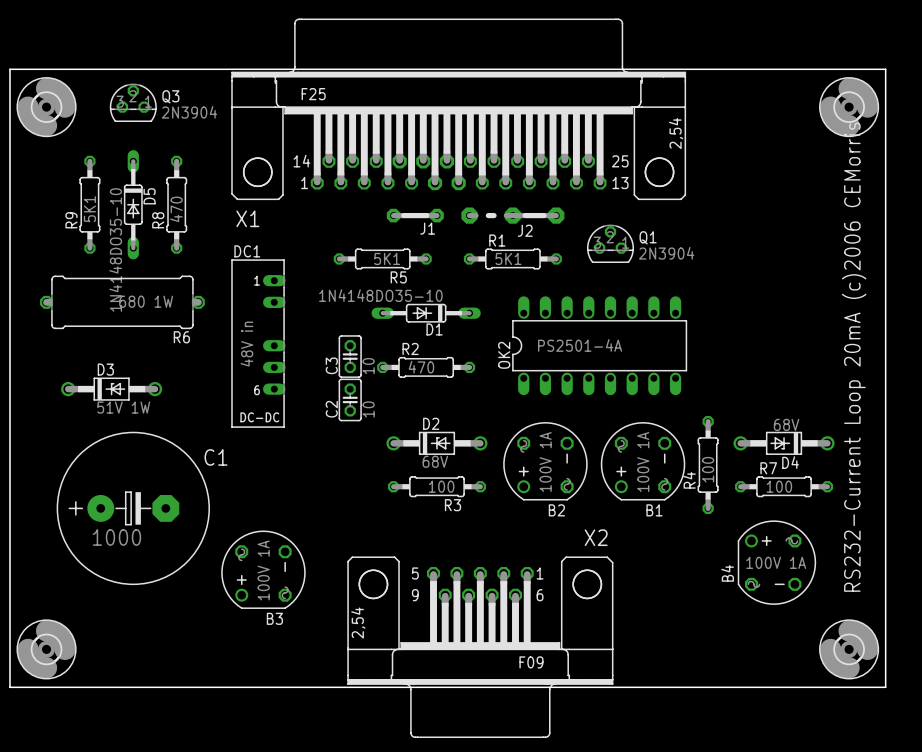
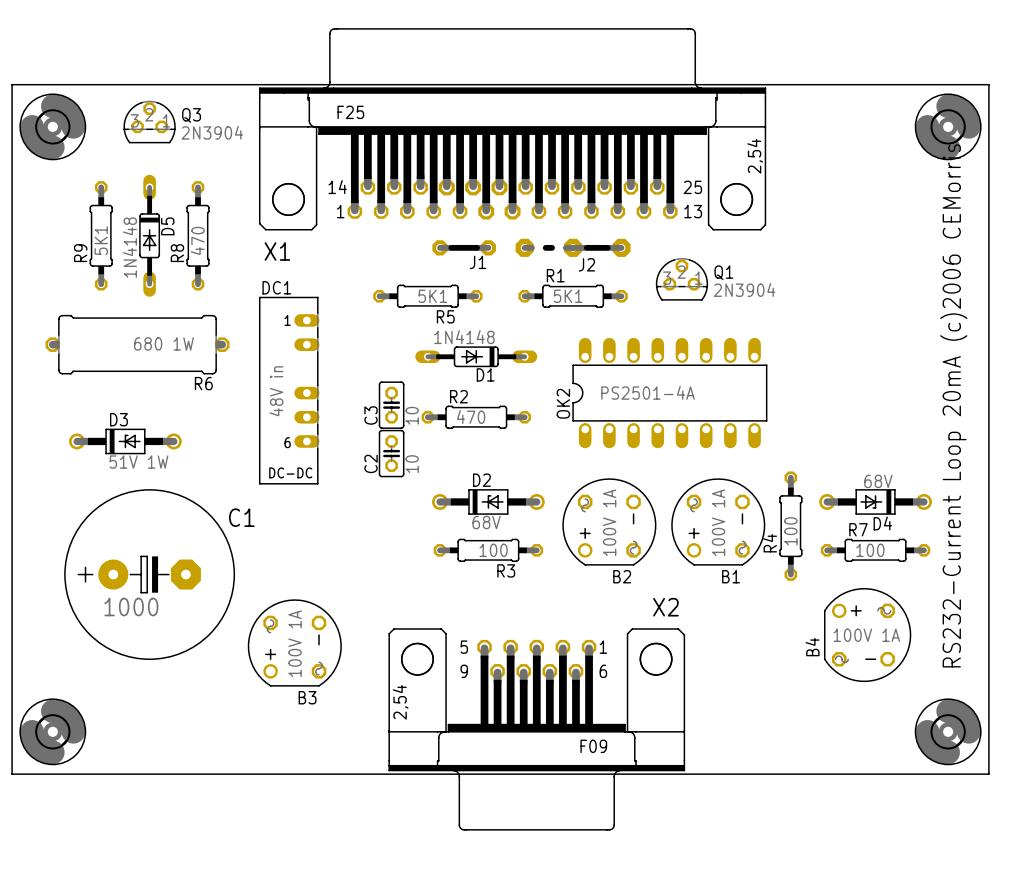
D5 value: 1N4148DO35-10 (115, 250) -> 1N4148 (129, 247)
D1 value: 1N4148DO35-10 (380, 295) -> 1N4148 (464, 337)

